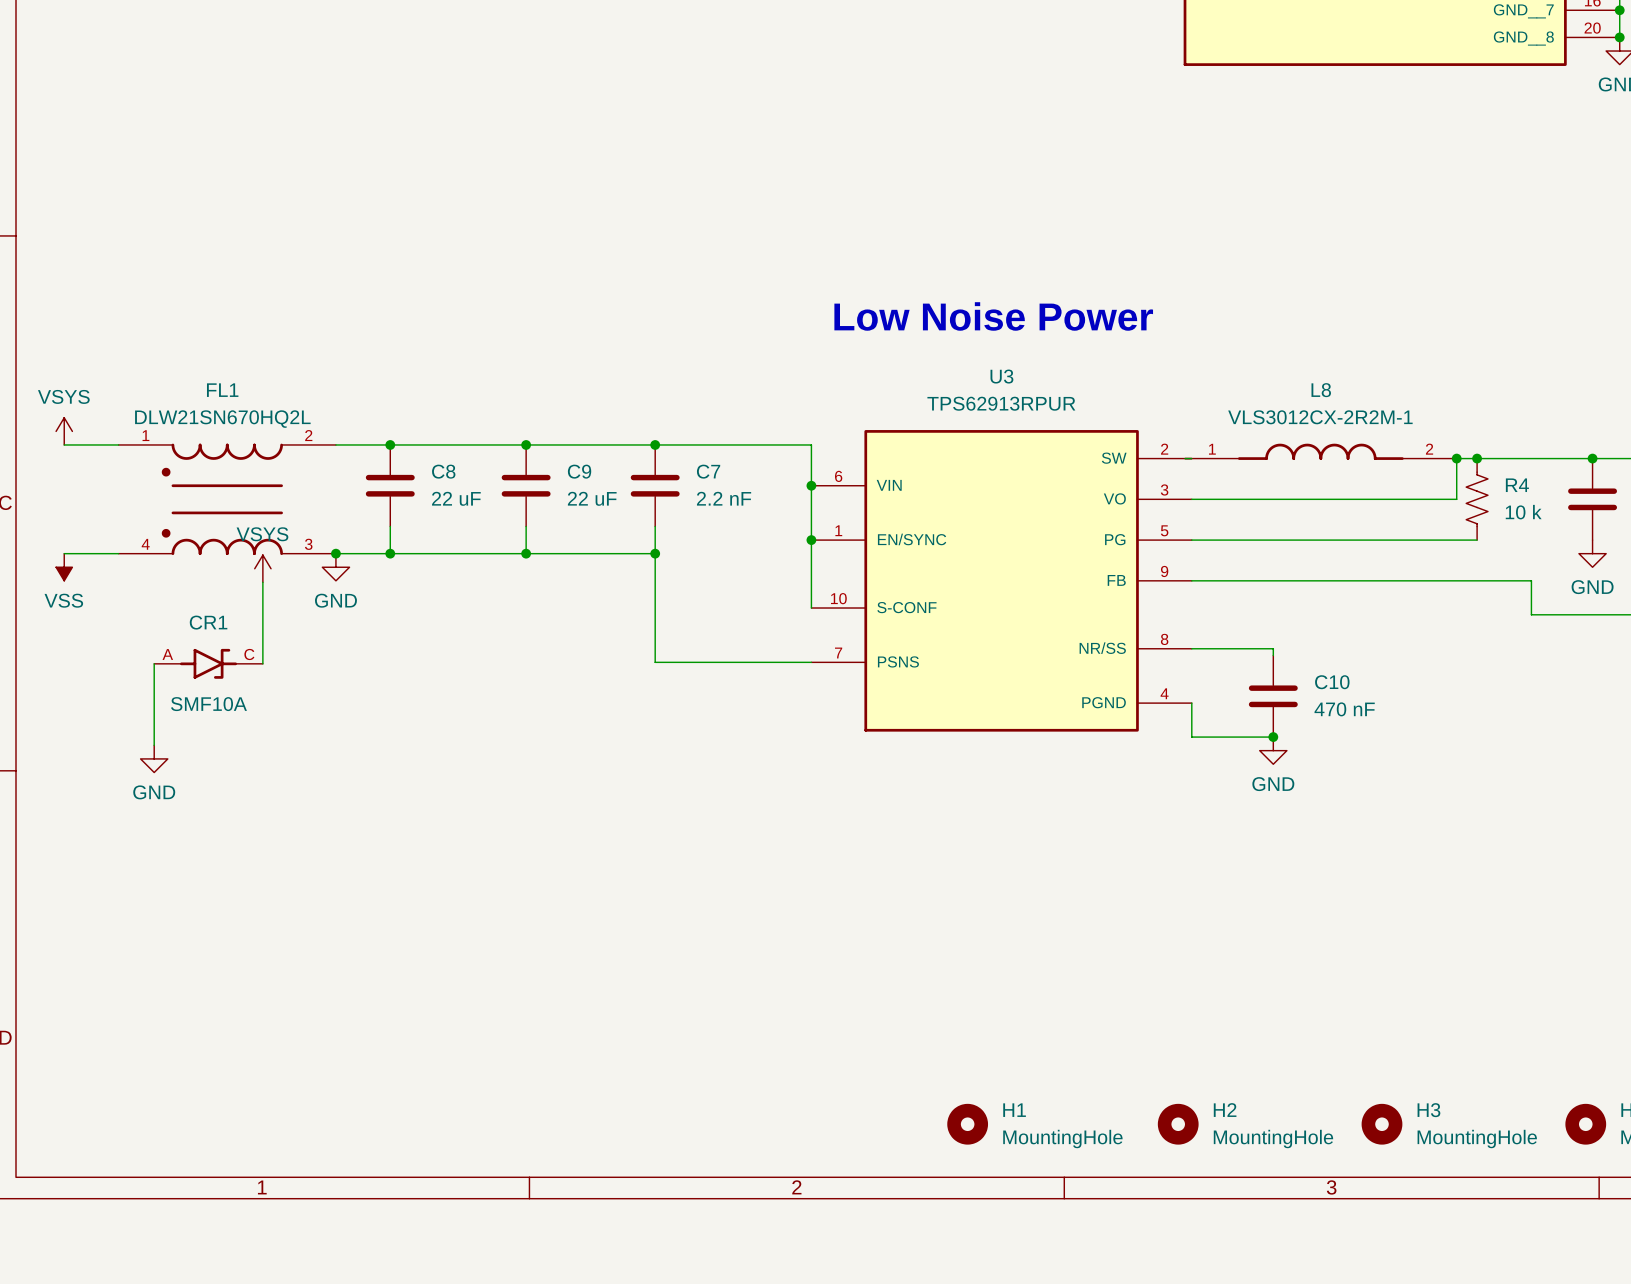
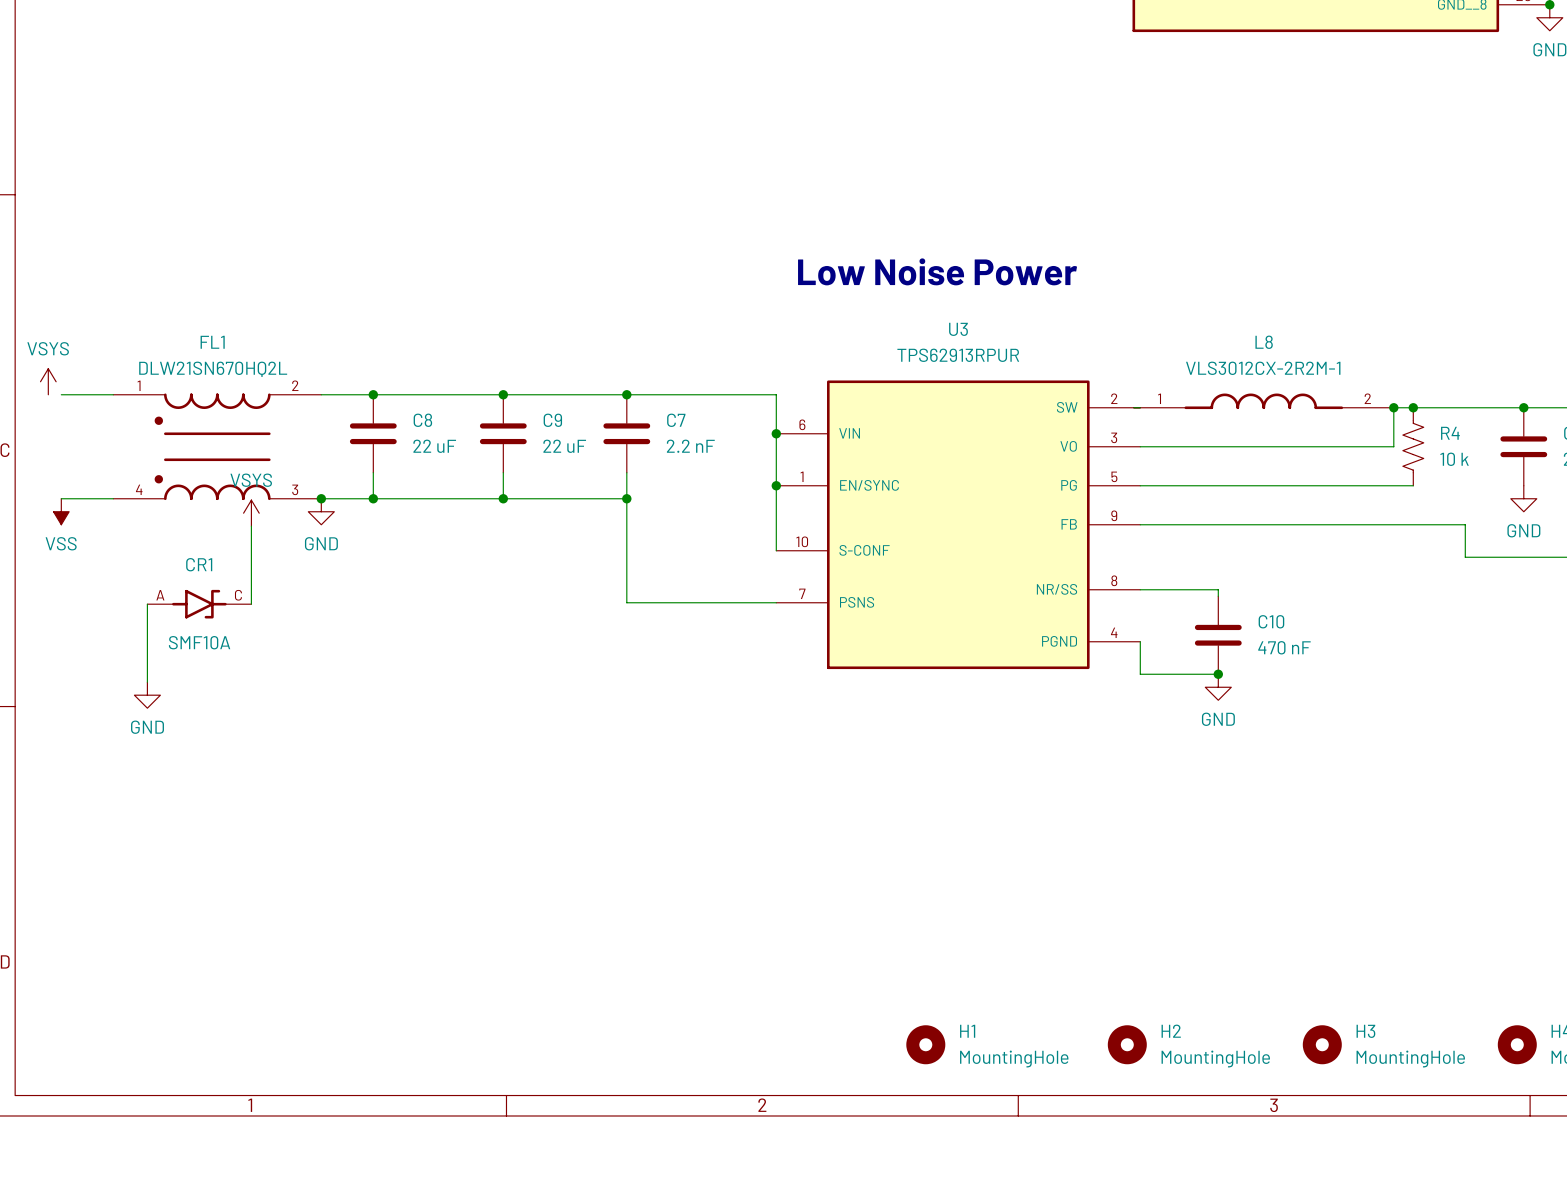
power symbol position: VSYS (64, 431) -> VSYS (48, 381)

